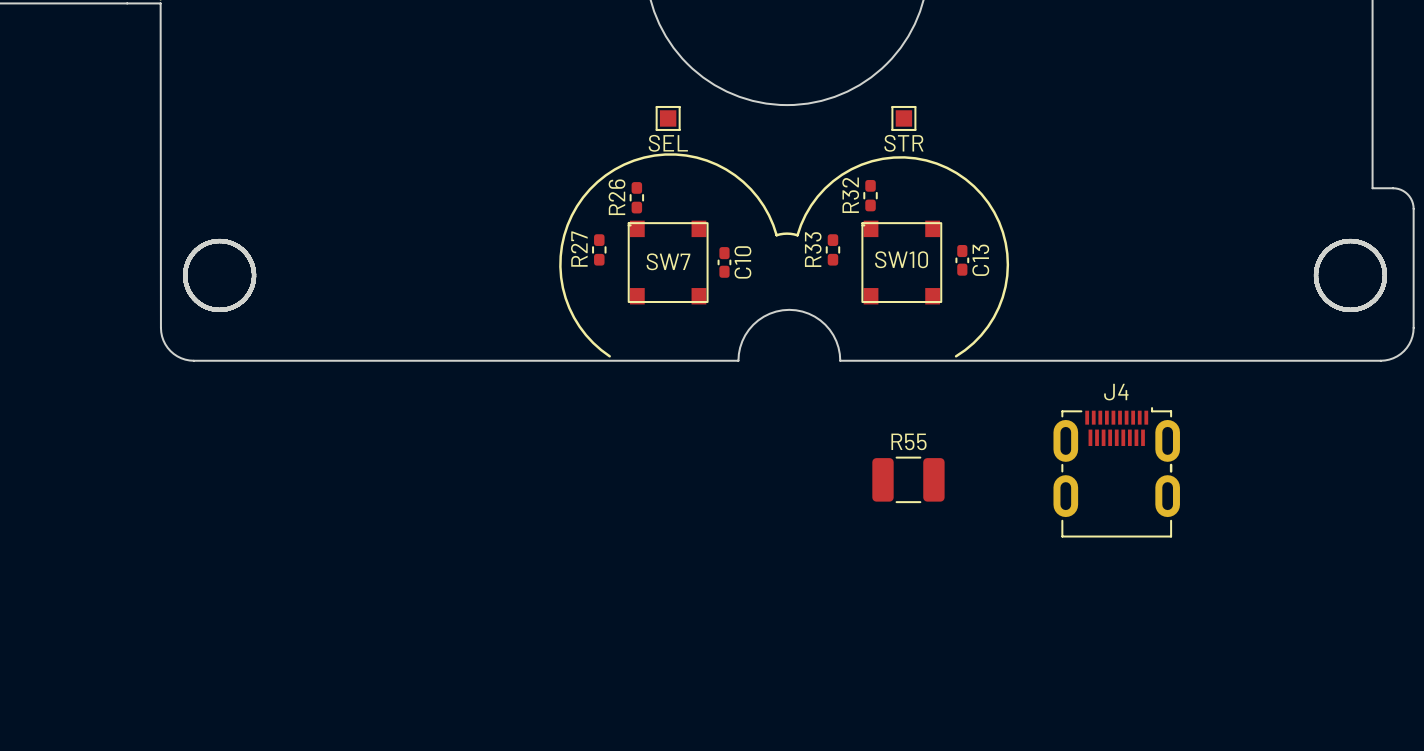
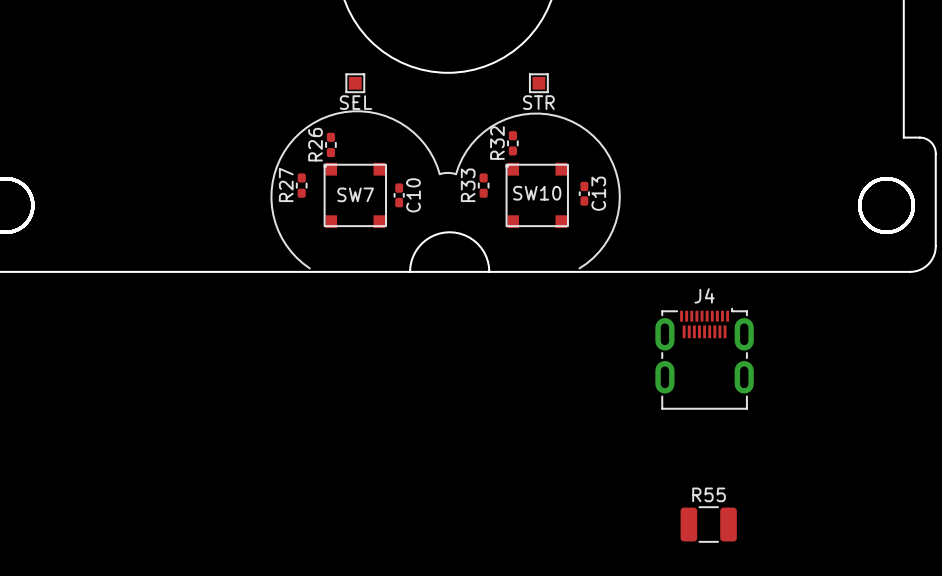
board edge: none -> (410, 271) (489, 271)
R55 position: (908, 479) -> (708, 524)

